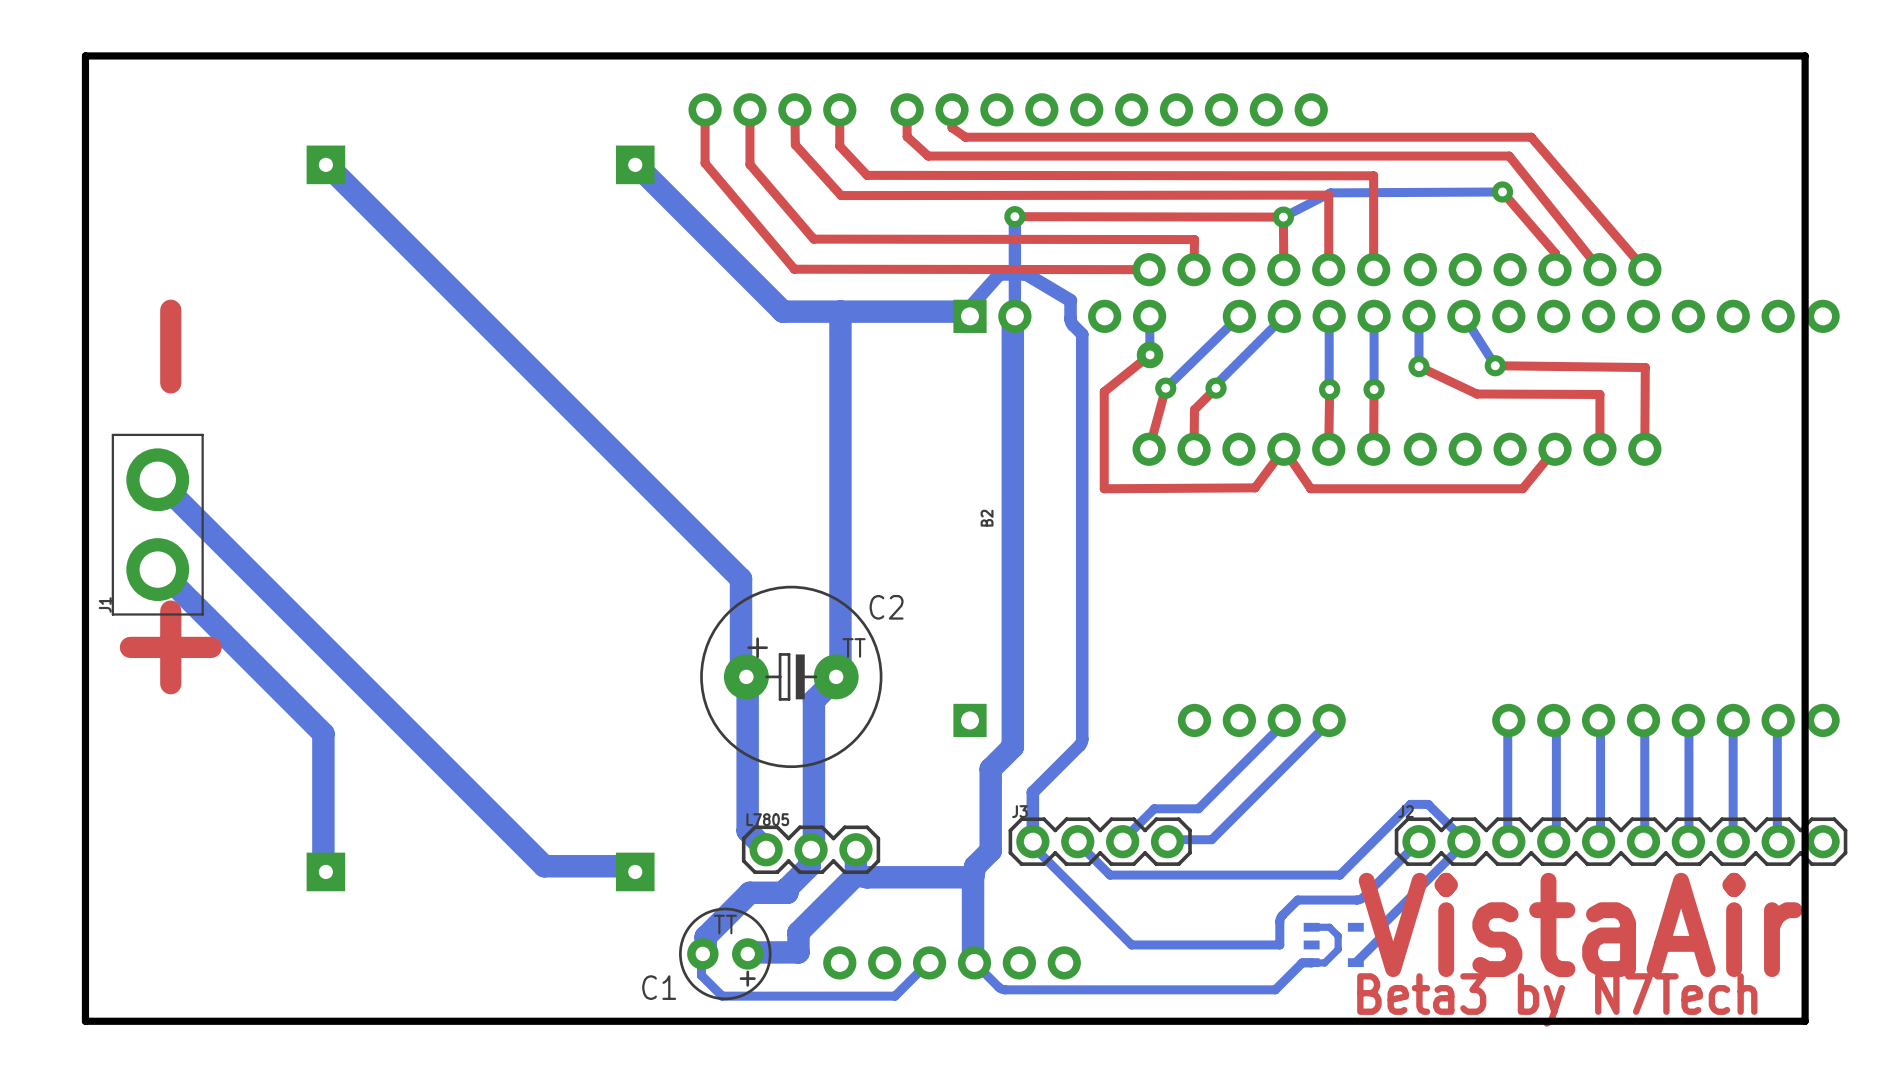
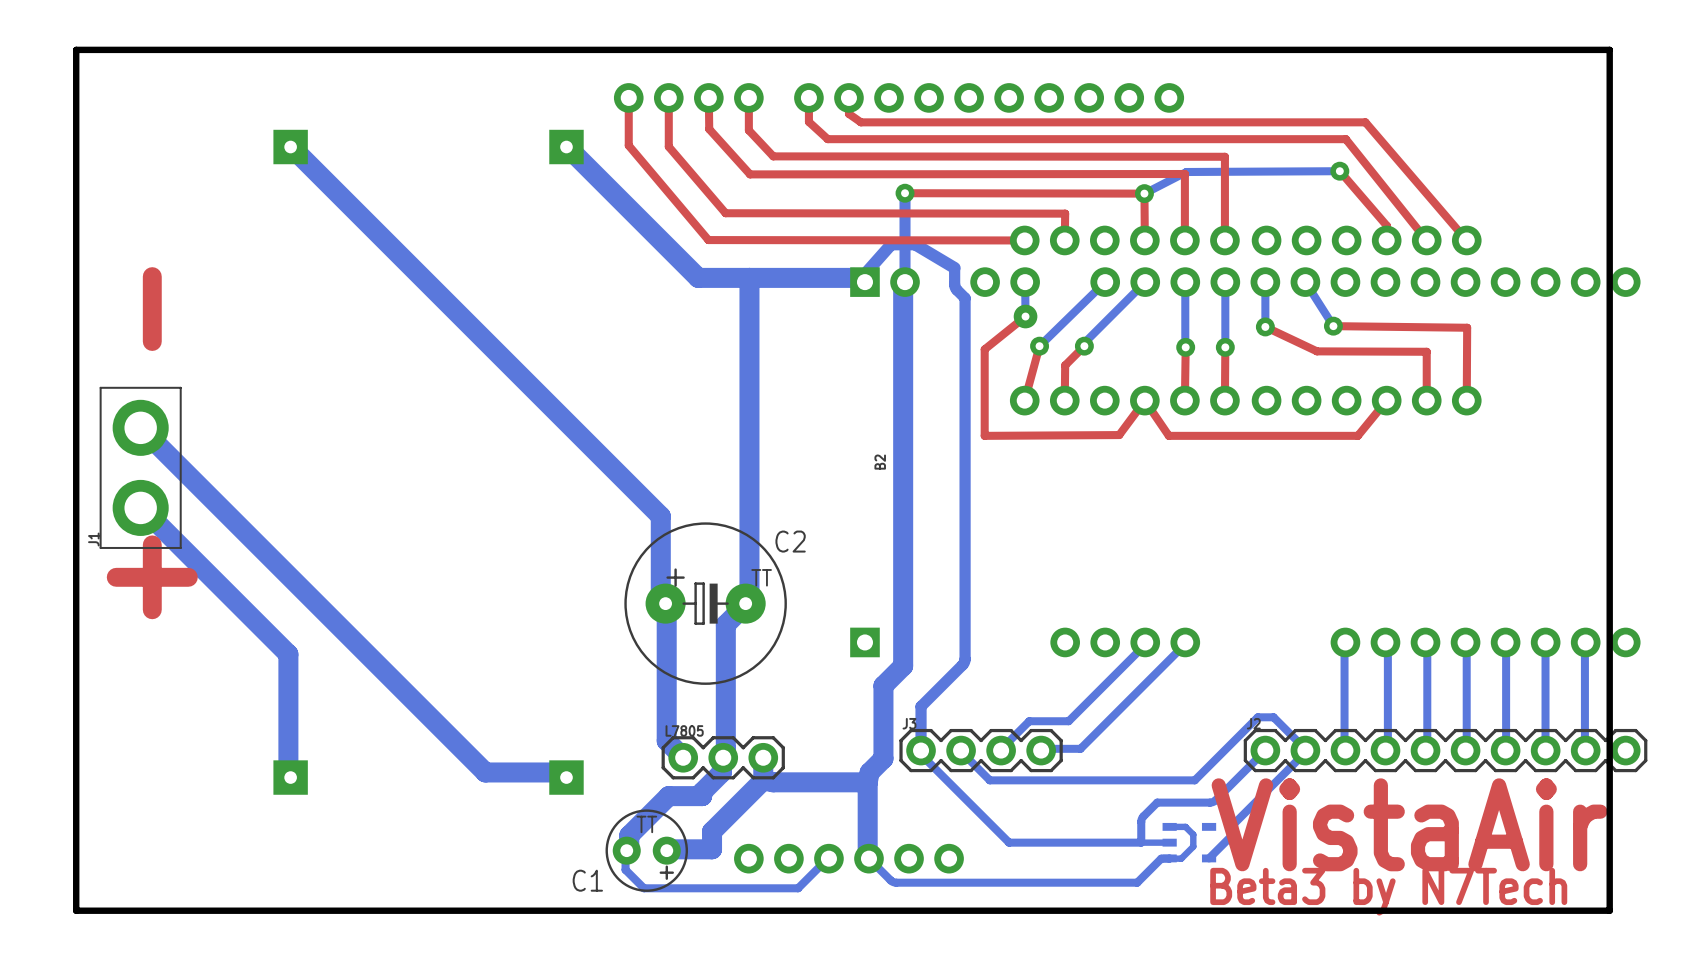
bottom track: none -> (1141, 842) (1169, 842)

